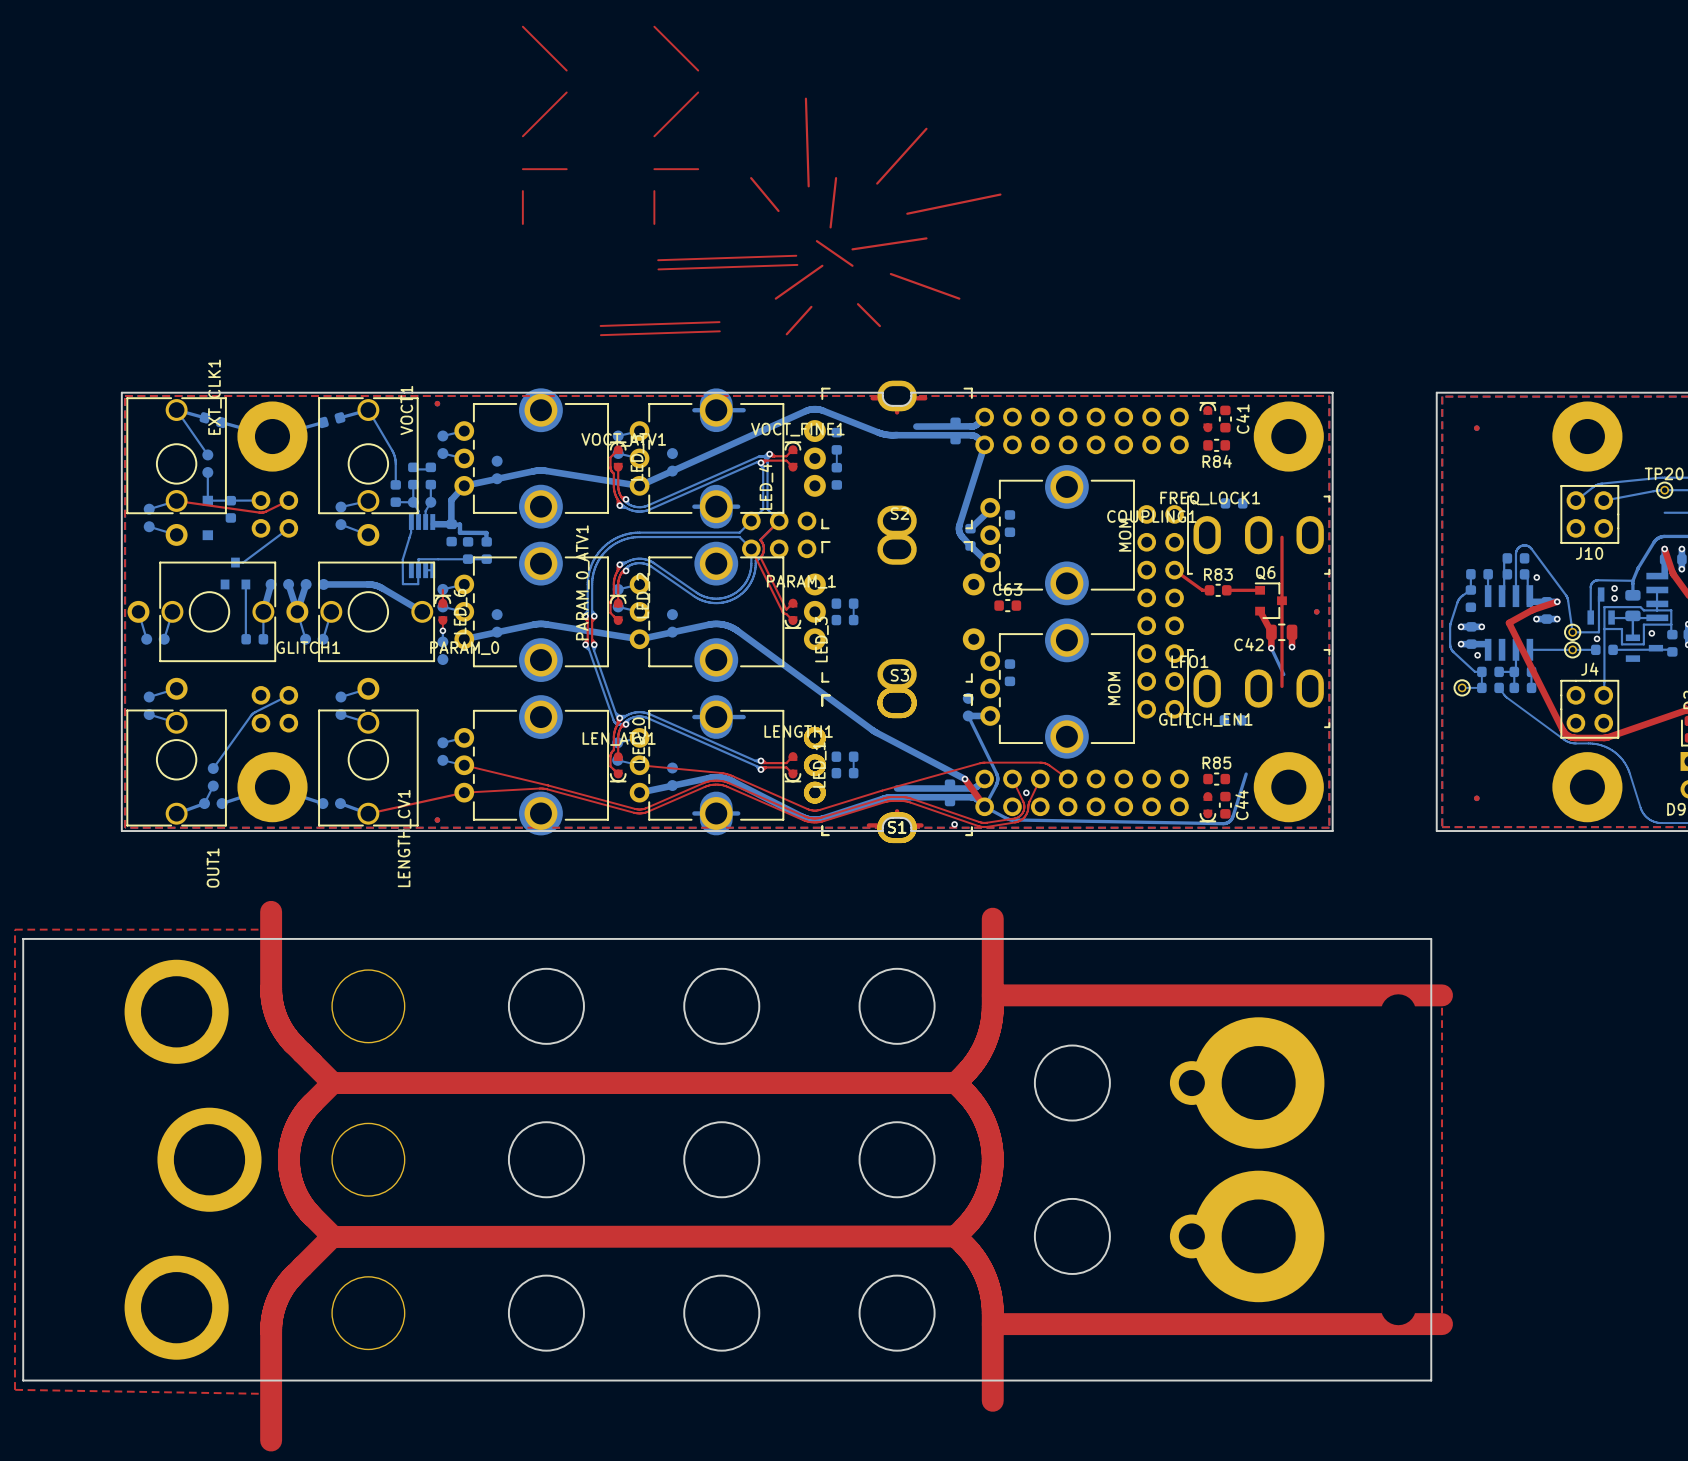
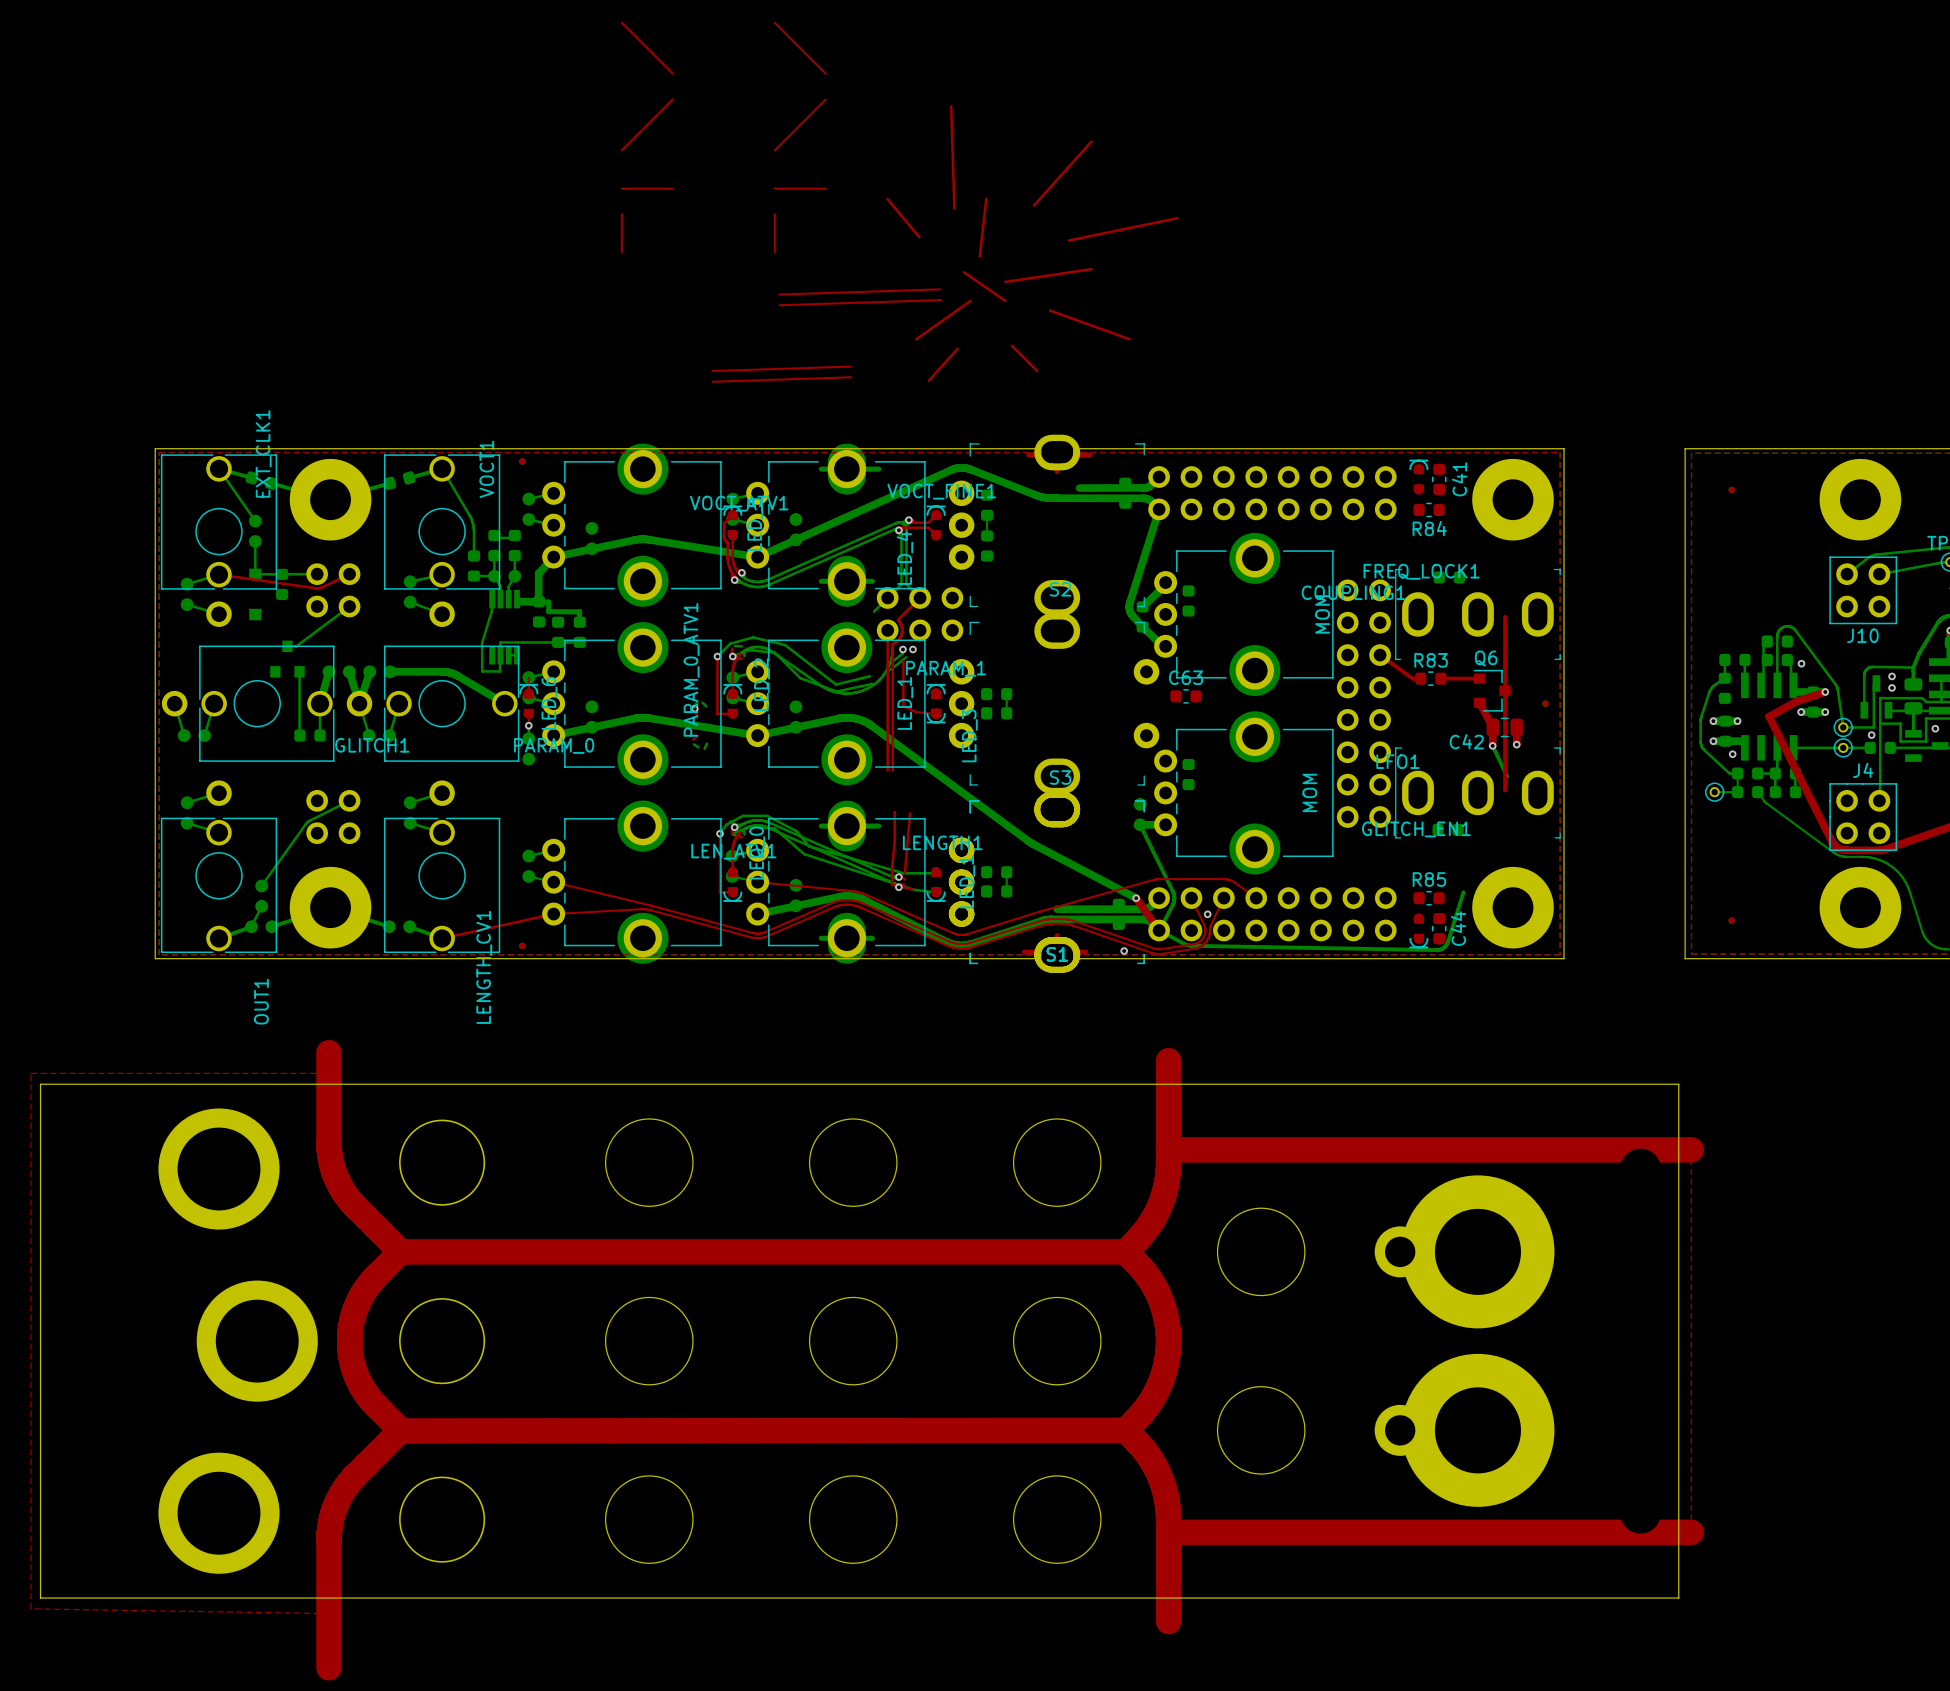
bottom track: (739, 532) (637, 532) (615, 538) (600, 550) (591, 566) (587, 580) (587, 616) -> none
top track: (760, 539) (763, 548) (760, 557) (786, 609) (790, 605) -> (898, 620) (902, 631) (899, 639) (892, 644) (892, 770)
top track: (751, 548) (782, 611) (790, 617) -> (887, 630) (887, 770)
via: (619, 564) -> none
via: none -> (902, 649)
via: none -> (912, 649)
top track: (621, 566) (614, 577) (613, 596) (610, 602) (610, 612) (618, 620) -> (717, 656) (717, 713) (732, 713)
bottom track: (621, 566) (634, 559) (647, 559) (700, 595) (710, 598) (721, 598) (735, 592) (746, 581) (750, 568) (751, 548) (739, 537) (637, 537) (621, 540) (606, 550) (595, 566) (592, 580) (592, 616) -> none
bottom track: none -> (902, 653) (887, 666)
via: (626, 570) -> none
bottom track: none -> (717, 656) (730, 643) (753, 637) (785, 645) (836, 684) (869, 676)
via: none -> (717, 656)
bottom track: none -> (732, 656) (748, 650) (774, 652) (800, 678) (836, 691) (872, 683)
via: none -> (732, 656)
bottom track: none -> (906, 657) (890, 670)
top track: none -> (903, 661) (903, 705) (916, 712)
LED_1: none -> (936, 701)
top track: (587, 616) (587, 644) -> none
top track: (592, 616) (592, 644) -> none
via: (594, 616) -> none
top track: (595, 618) (592, 621) -> none
top track: none -> (918, 712) (936, 713)
top track: (592, 639) (595, 642) -> none
via: (585, 644) -> none
bottom track: (587, 644) (613, 720) (619, 724) (624, 722) -> none
via: (594, 644) -> none
bottom track: (592, 645) (617, 718) -> none
top track: none -> (894, 812) (892, 884) (912, 889)
top track: none -> (909, 813) (904, 873)
top track: (621, 719) (614, 730) (613, 750) (610, 755) (610, 766) (618, 774) -> (720, 833) (720, 892) (732, 892)
bottom track: none -> (720, 833) (726, 824) (742, 815) (767, 815) (796, 831) (809, 846) (903, 873) (935, 873)
bottom track: none -> (732, 833) (750, 826) (774, 828) (804, 854) (913, 889) (935, 892)
via position: (626, 724) -> (720, 833)
top track: (790, 759) (786, 763) (761, 763) -> none
top track: (762, 770) (766, 767) (786, 767) (790, 771) -> none

